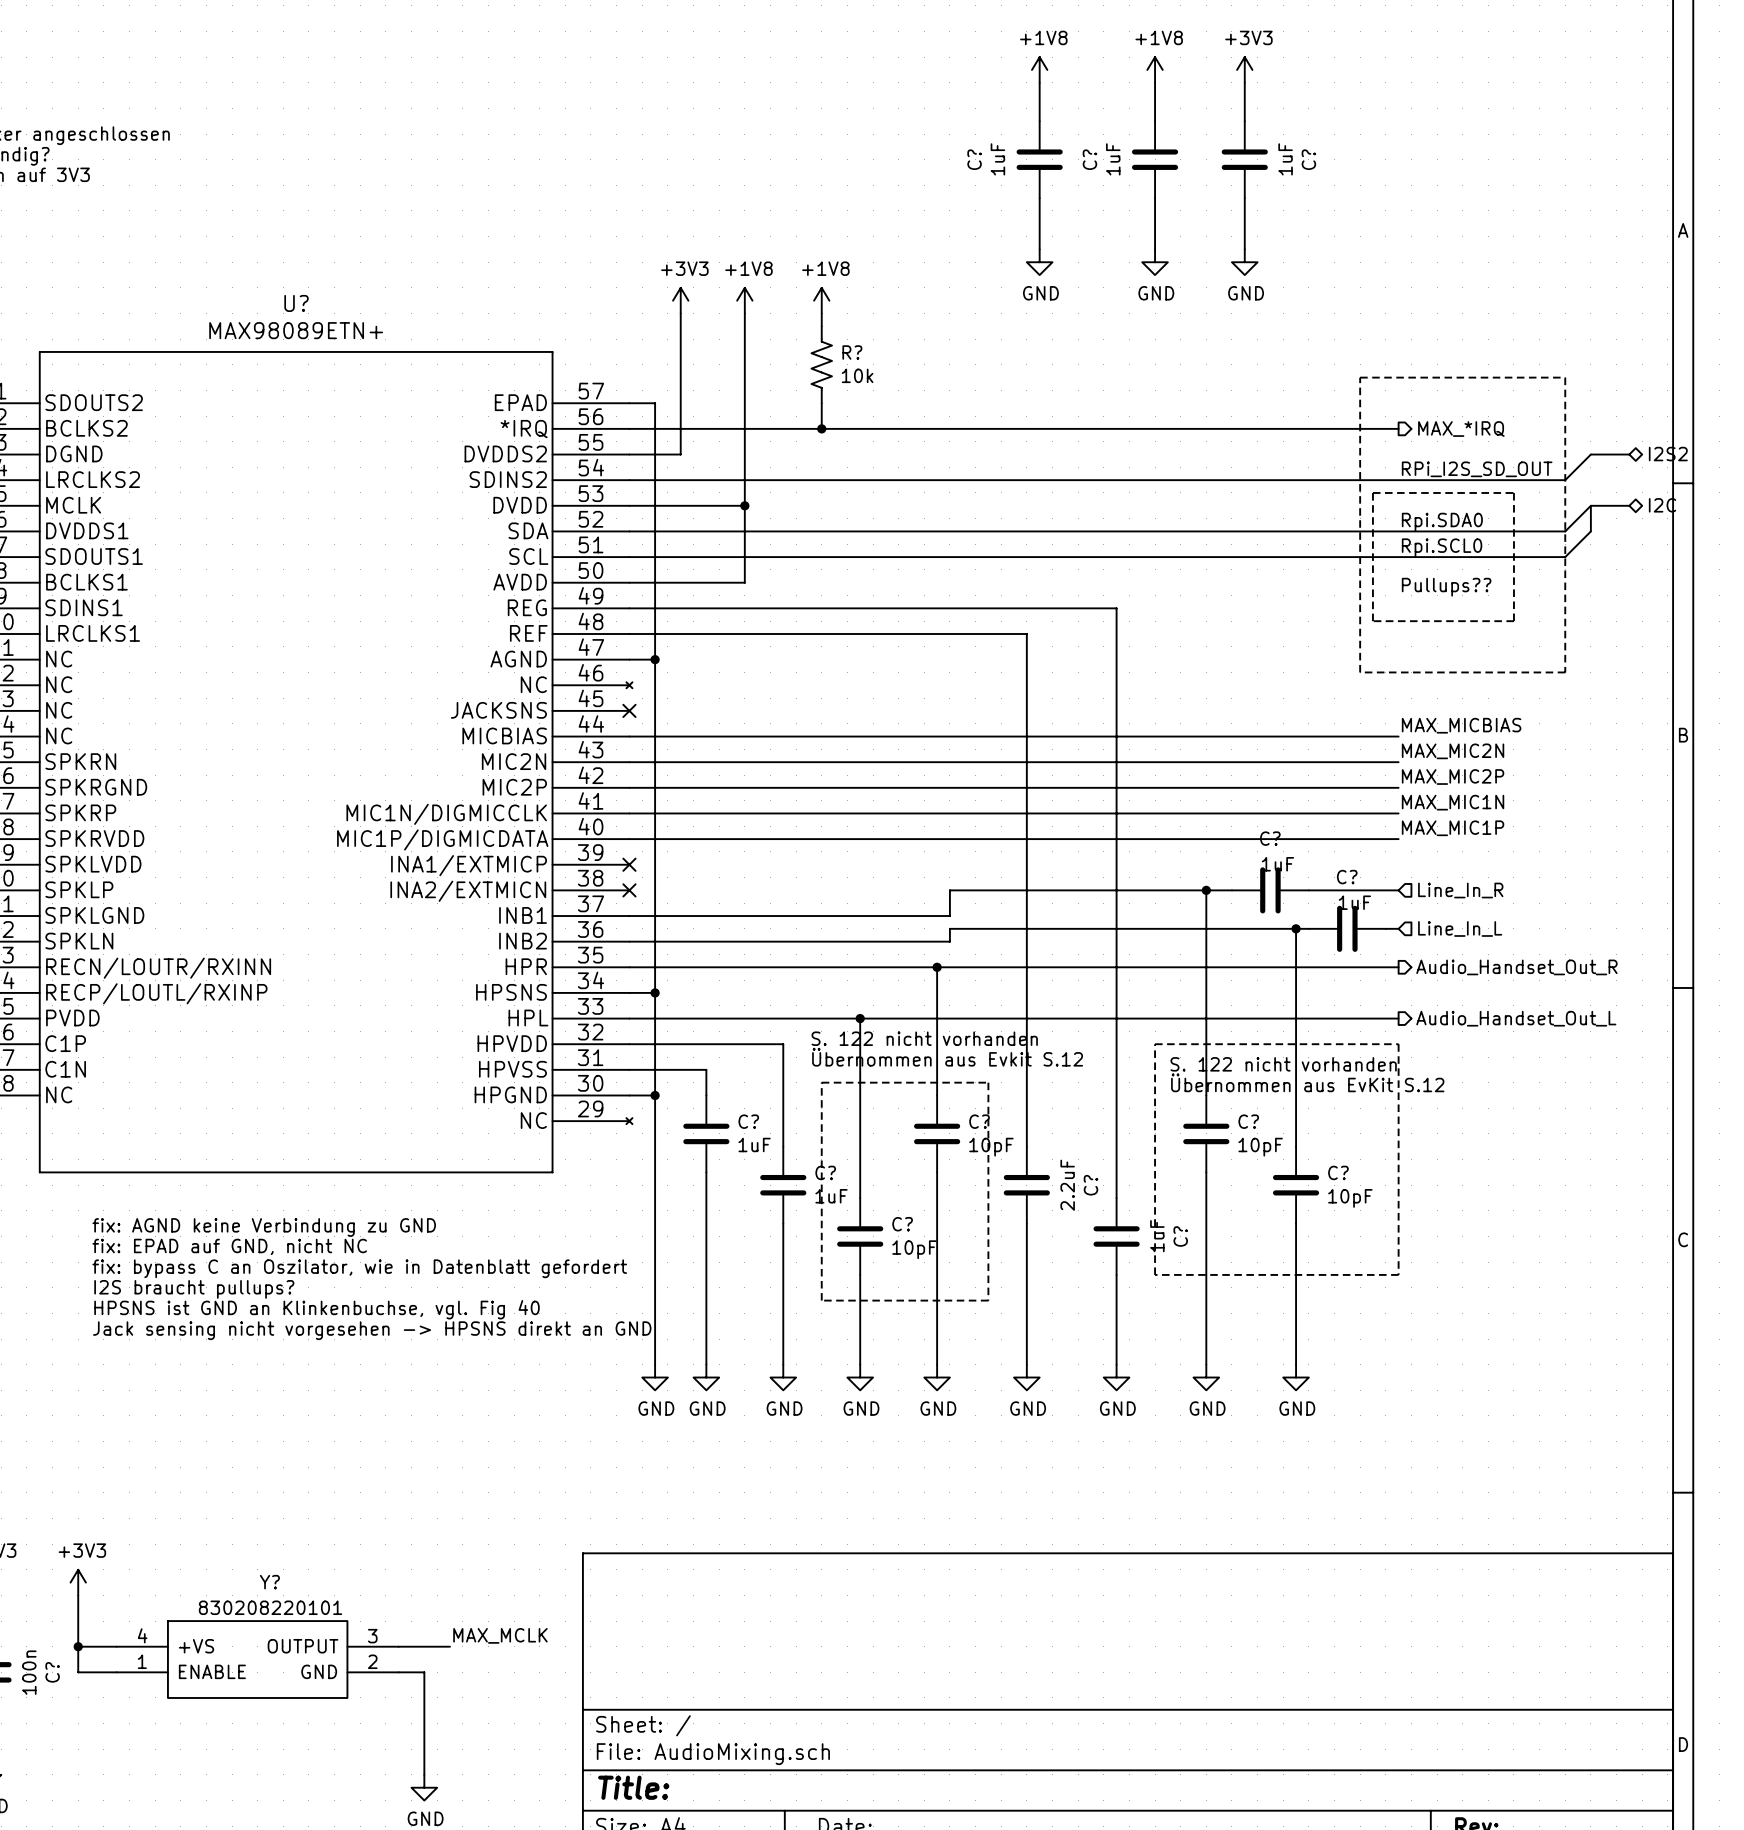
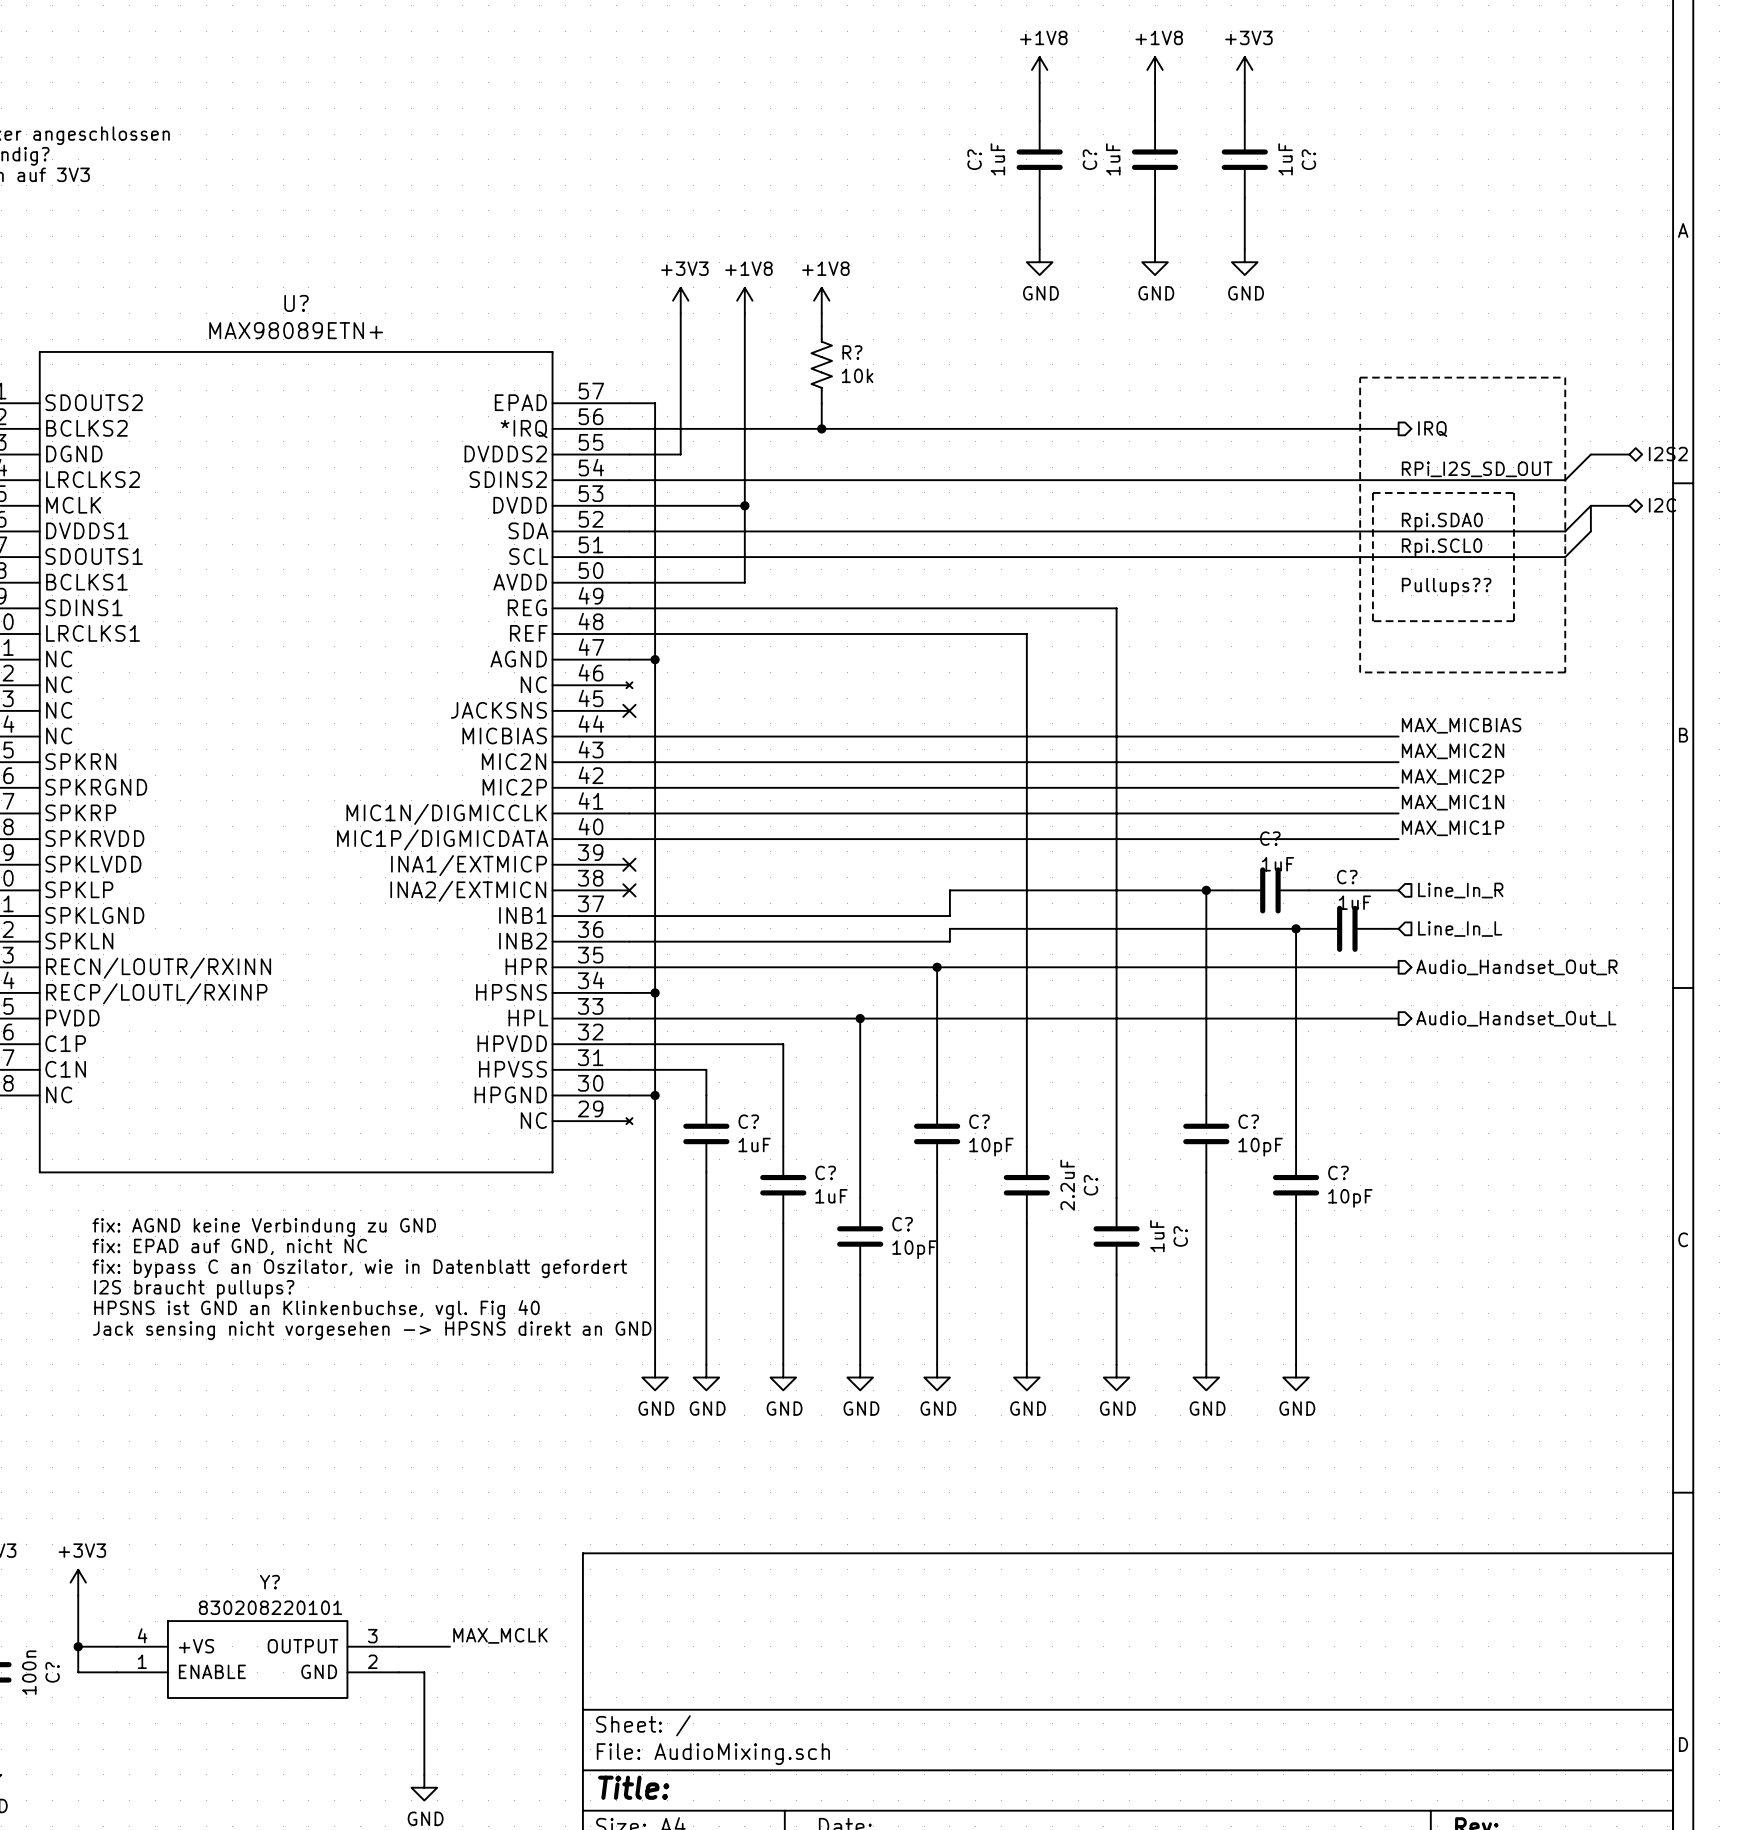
hierarchical label: MAX_*IRQ (1461, 429) -> IRQ (1432, 429)
text: S. 122 nicht vorhanden (924, 1038) -> none
line: (1155, 1044) (1398, 1044) (1398, 1274) (1155, 1274) (1155, 1044) -> none
text: Übernommen aus Evkit S.12 (947, 1057) -> none
text: S. 122 nicht vorhanden (1283, 1064) -> none
line: (821, 1082) (988, 1082) (988, 1300) (821, 1300) (821, 1082) -> none
text: Übernommen aus EvKit S.12 (1307, 1082) -> none

